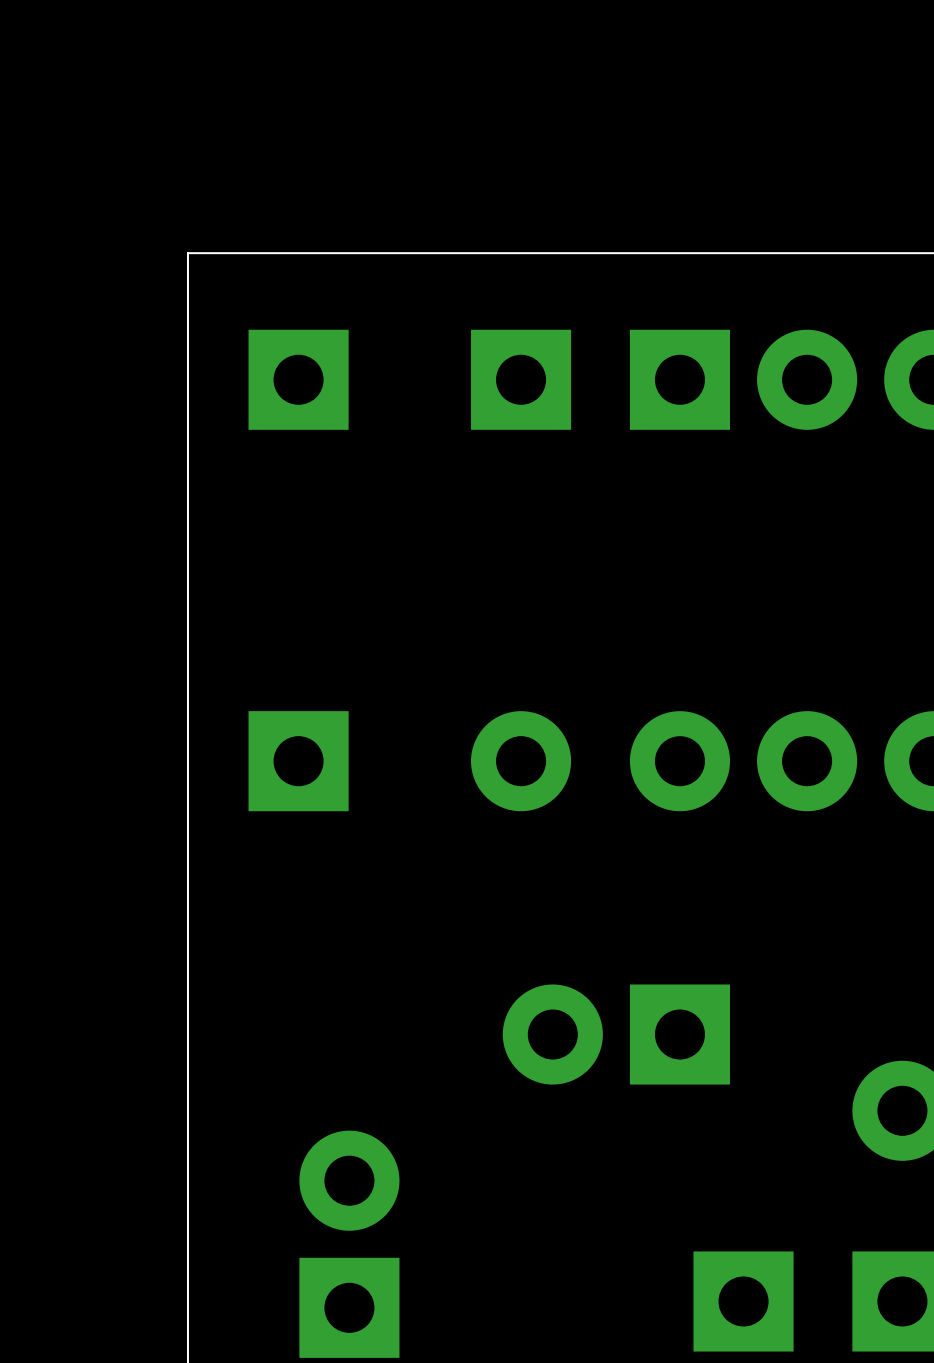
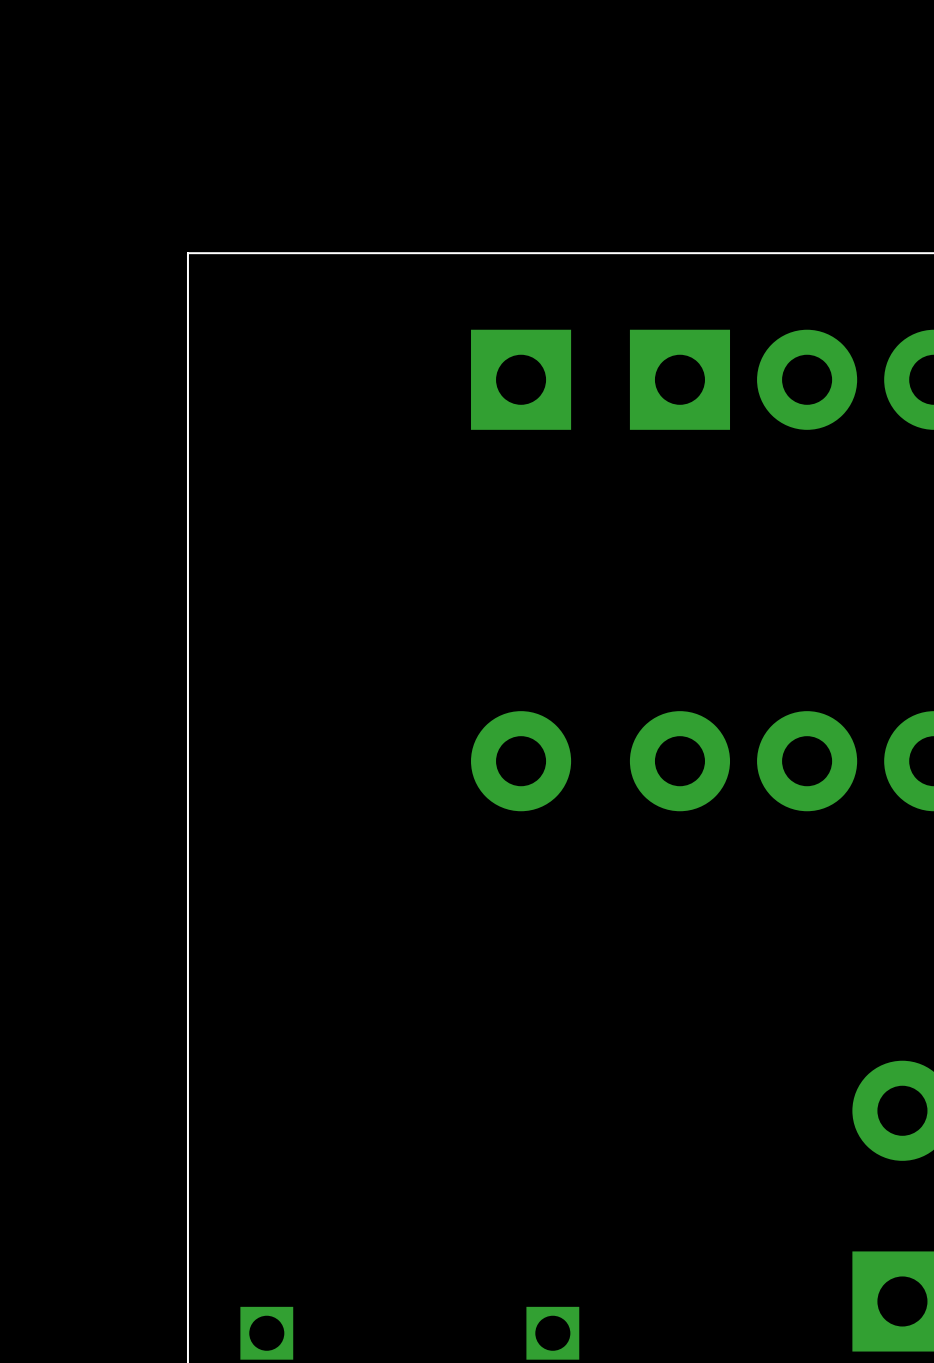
part: (298, 379) -> none
part: (298, 761) -> none
part: (616, 1034) -> none
part: (349, 1244) -> none
part: (743, 1301) -> none
part: none -> (266, 1333)
part: none -> (552, 1333)

